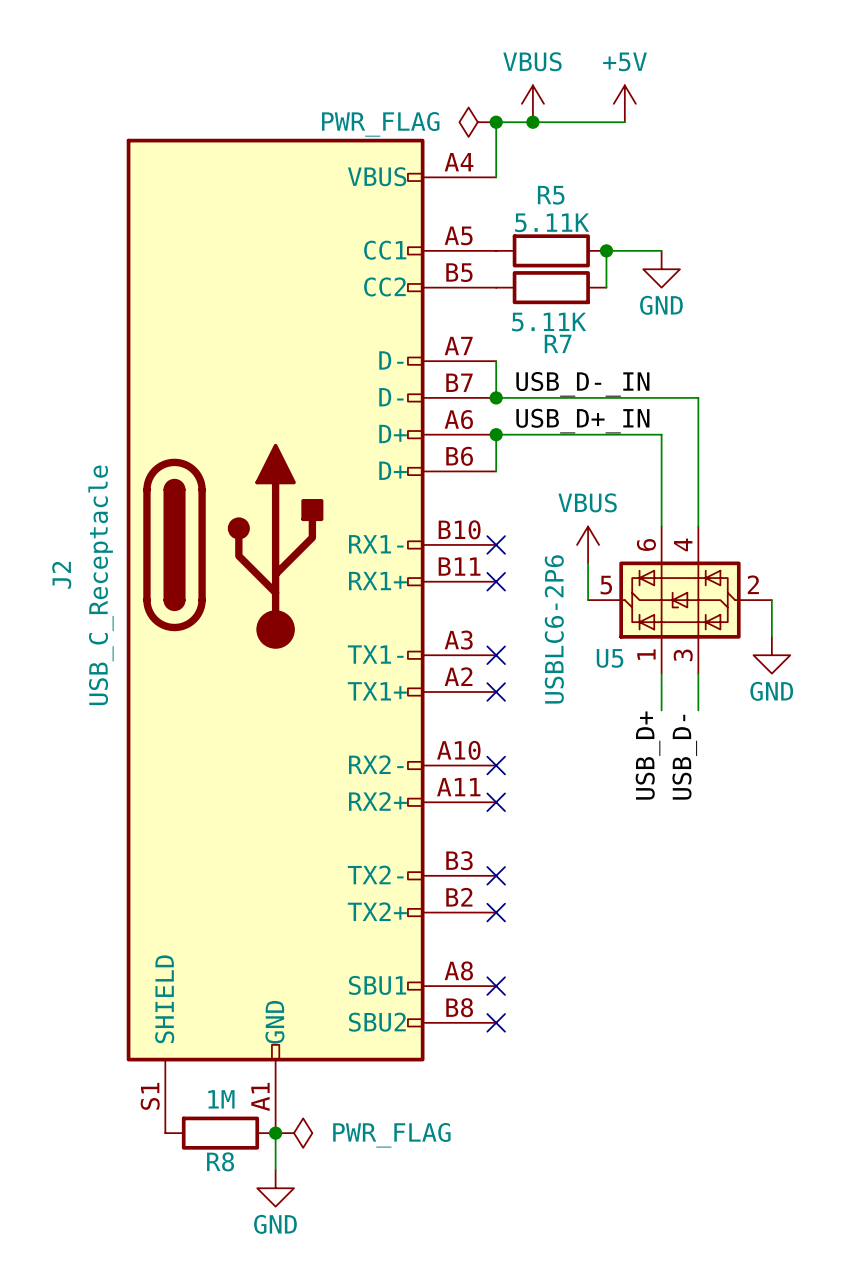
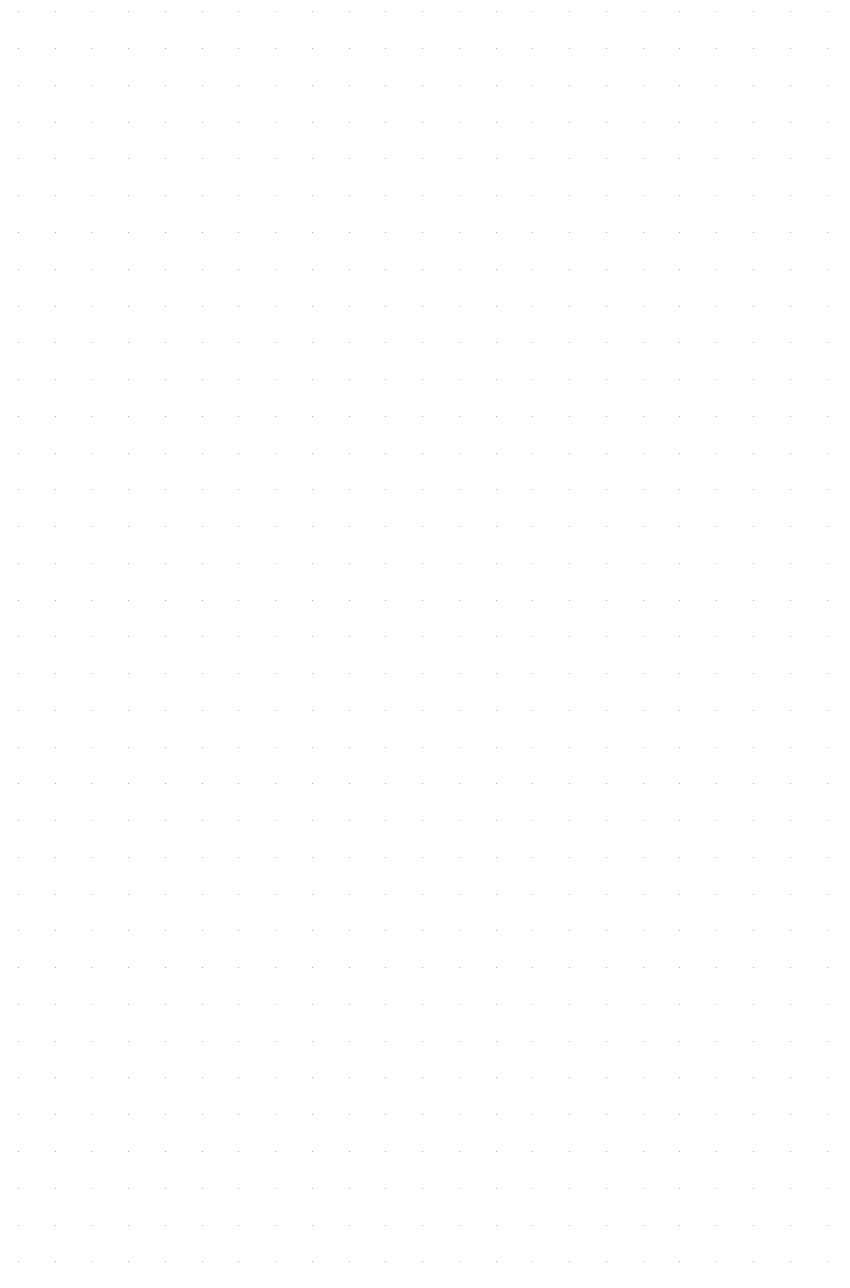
power symbol: VBUS (532, 103) -> none
power symbol: +5V (624, 103) -> none
power symbol: PWR_FLAG (477, 122) -> none
junction: (496, 122) -> none
junction: (532, 122) -> none
wire: (624, 122) (496, 122) (496, 177) -> none
R5: 5.11K (551, 250) -> none
junction: (606, 250) -> none
wire: (661, 250) (606, 250) (606, 287) -> none
power symbol: GND (661, 269) -> none
R7: 5.11K (551, 287) -> none
wire: (496, 361) (496, 397) (698, 397) (698, 526) -> none
label: USB_D-_IN (582, 384) -> none
junction: (496, 397) -> none
label: USB_D+_IN (582, 421) -> none
junction: (496, 434) -> none
wire: (496, 471) (496, 434) (661, 434) (661, 526) -> none
no-connect mark: (496, 544) -> none
power symbol: VBUS (588, 544) -> none
wire: (588, 563) (588, 600) -> none
no-connect mark: (496, 581) -> none
U5: USBLC6-2P6 (679, 600) -> none
wire: (771, 600) (771, 636) -> none
J2: USB_C_Receptacle (311, 635) -> none
no-connect mark: (496, 655) -> none
power symbol: GND (771, 655) -> none
wire: (661, 673) (661, 710) -> none
wire: (698, 673) (698, 710) -> none
no-connect mark: (496, 692) -> none
label: USB_D+ (648, 755) -> none
label: USB_D- (684, 757) -> none
no-connect mark: (496, 765) -> none
no-connect mark: (496, 802) -> none
no-connect mark: (496, 875) -> none
no-connect mark: (496, 912) -> none
no-connect mark: (496, 986) -> none
no-connect mark: (496, 1022) -> none
R8: 1M (220, 1133) -> none
wire: (275, 1133) (275, 1169) -> none
junction: (275, 1133) -> none
power symbol: PWR_FLAG (293, 1133) -> none
power symbol: GND (275, 1188) -> none

